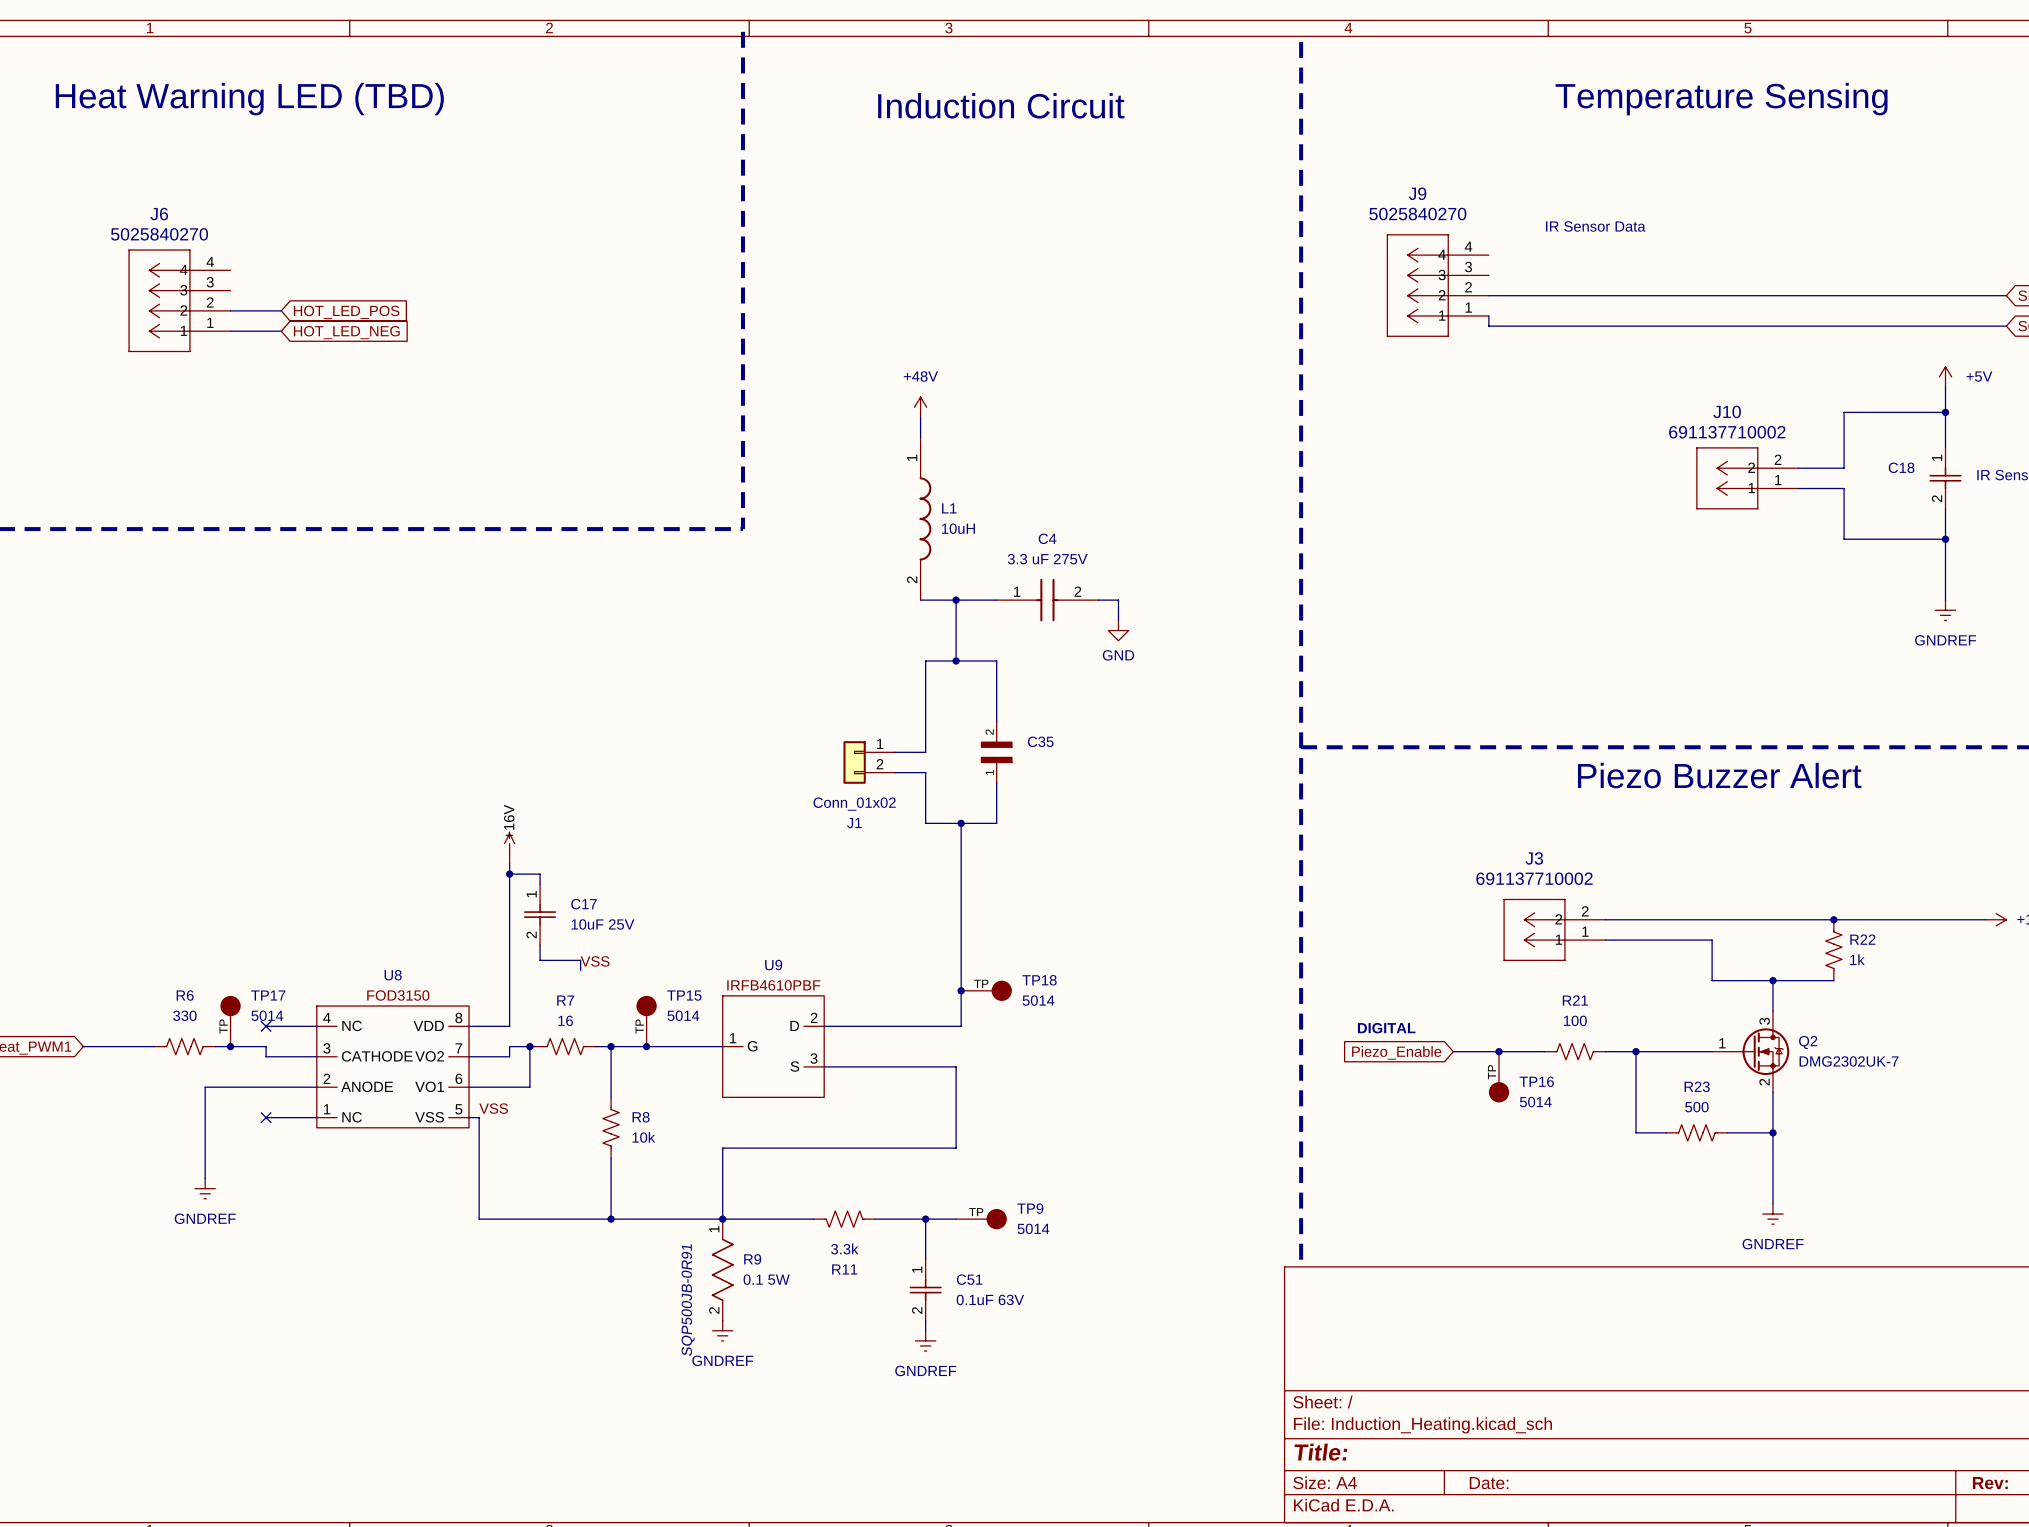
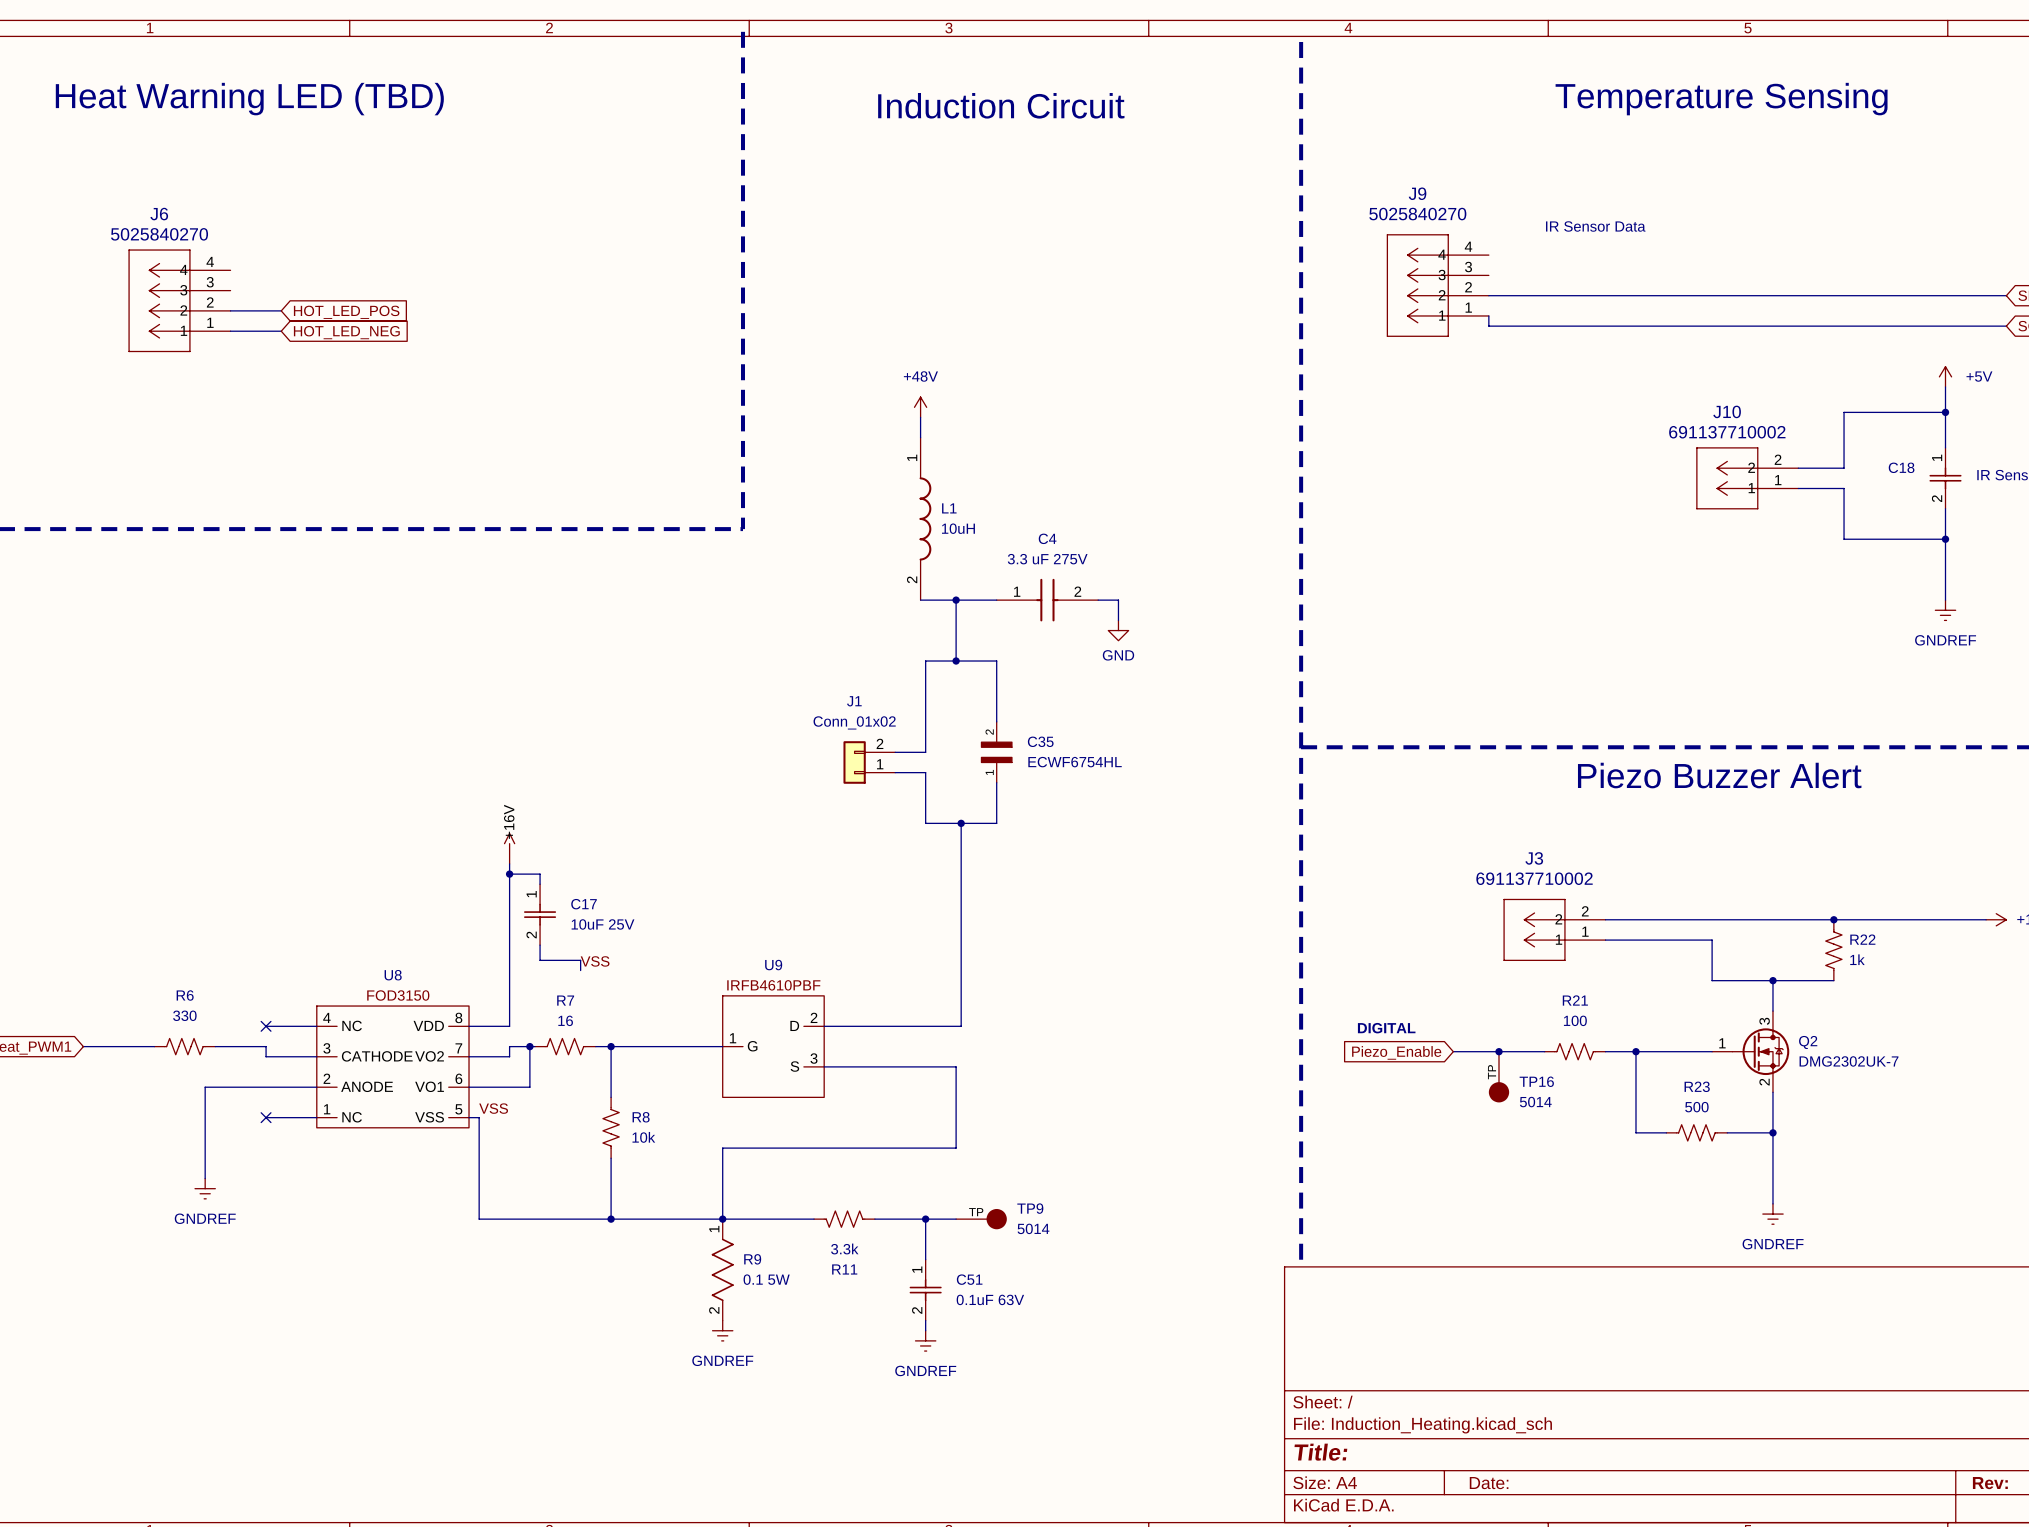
J1 flip: as is (854, 762) -> up-down (854, 762)
C35 value: none -> ECWF6754HL (1075, 762)
junction: (961, 990) -> none
TP18: 5014 (986, 990) -> none
TP17: 5014 (230, 1021) -> none
TP15: 5014 (646, 1021) -> none
junction: (230, 1046) -> none
junction: (646, 1046) -> none
R9 text: SQP500JB-0R91 (688, 1300) -> none

